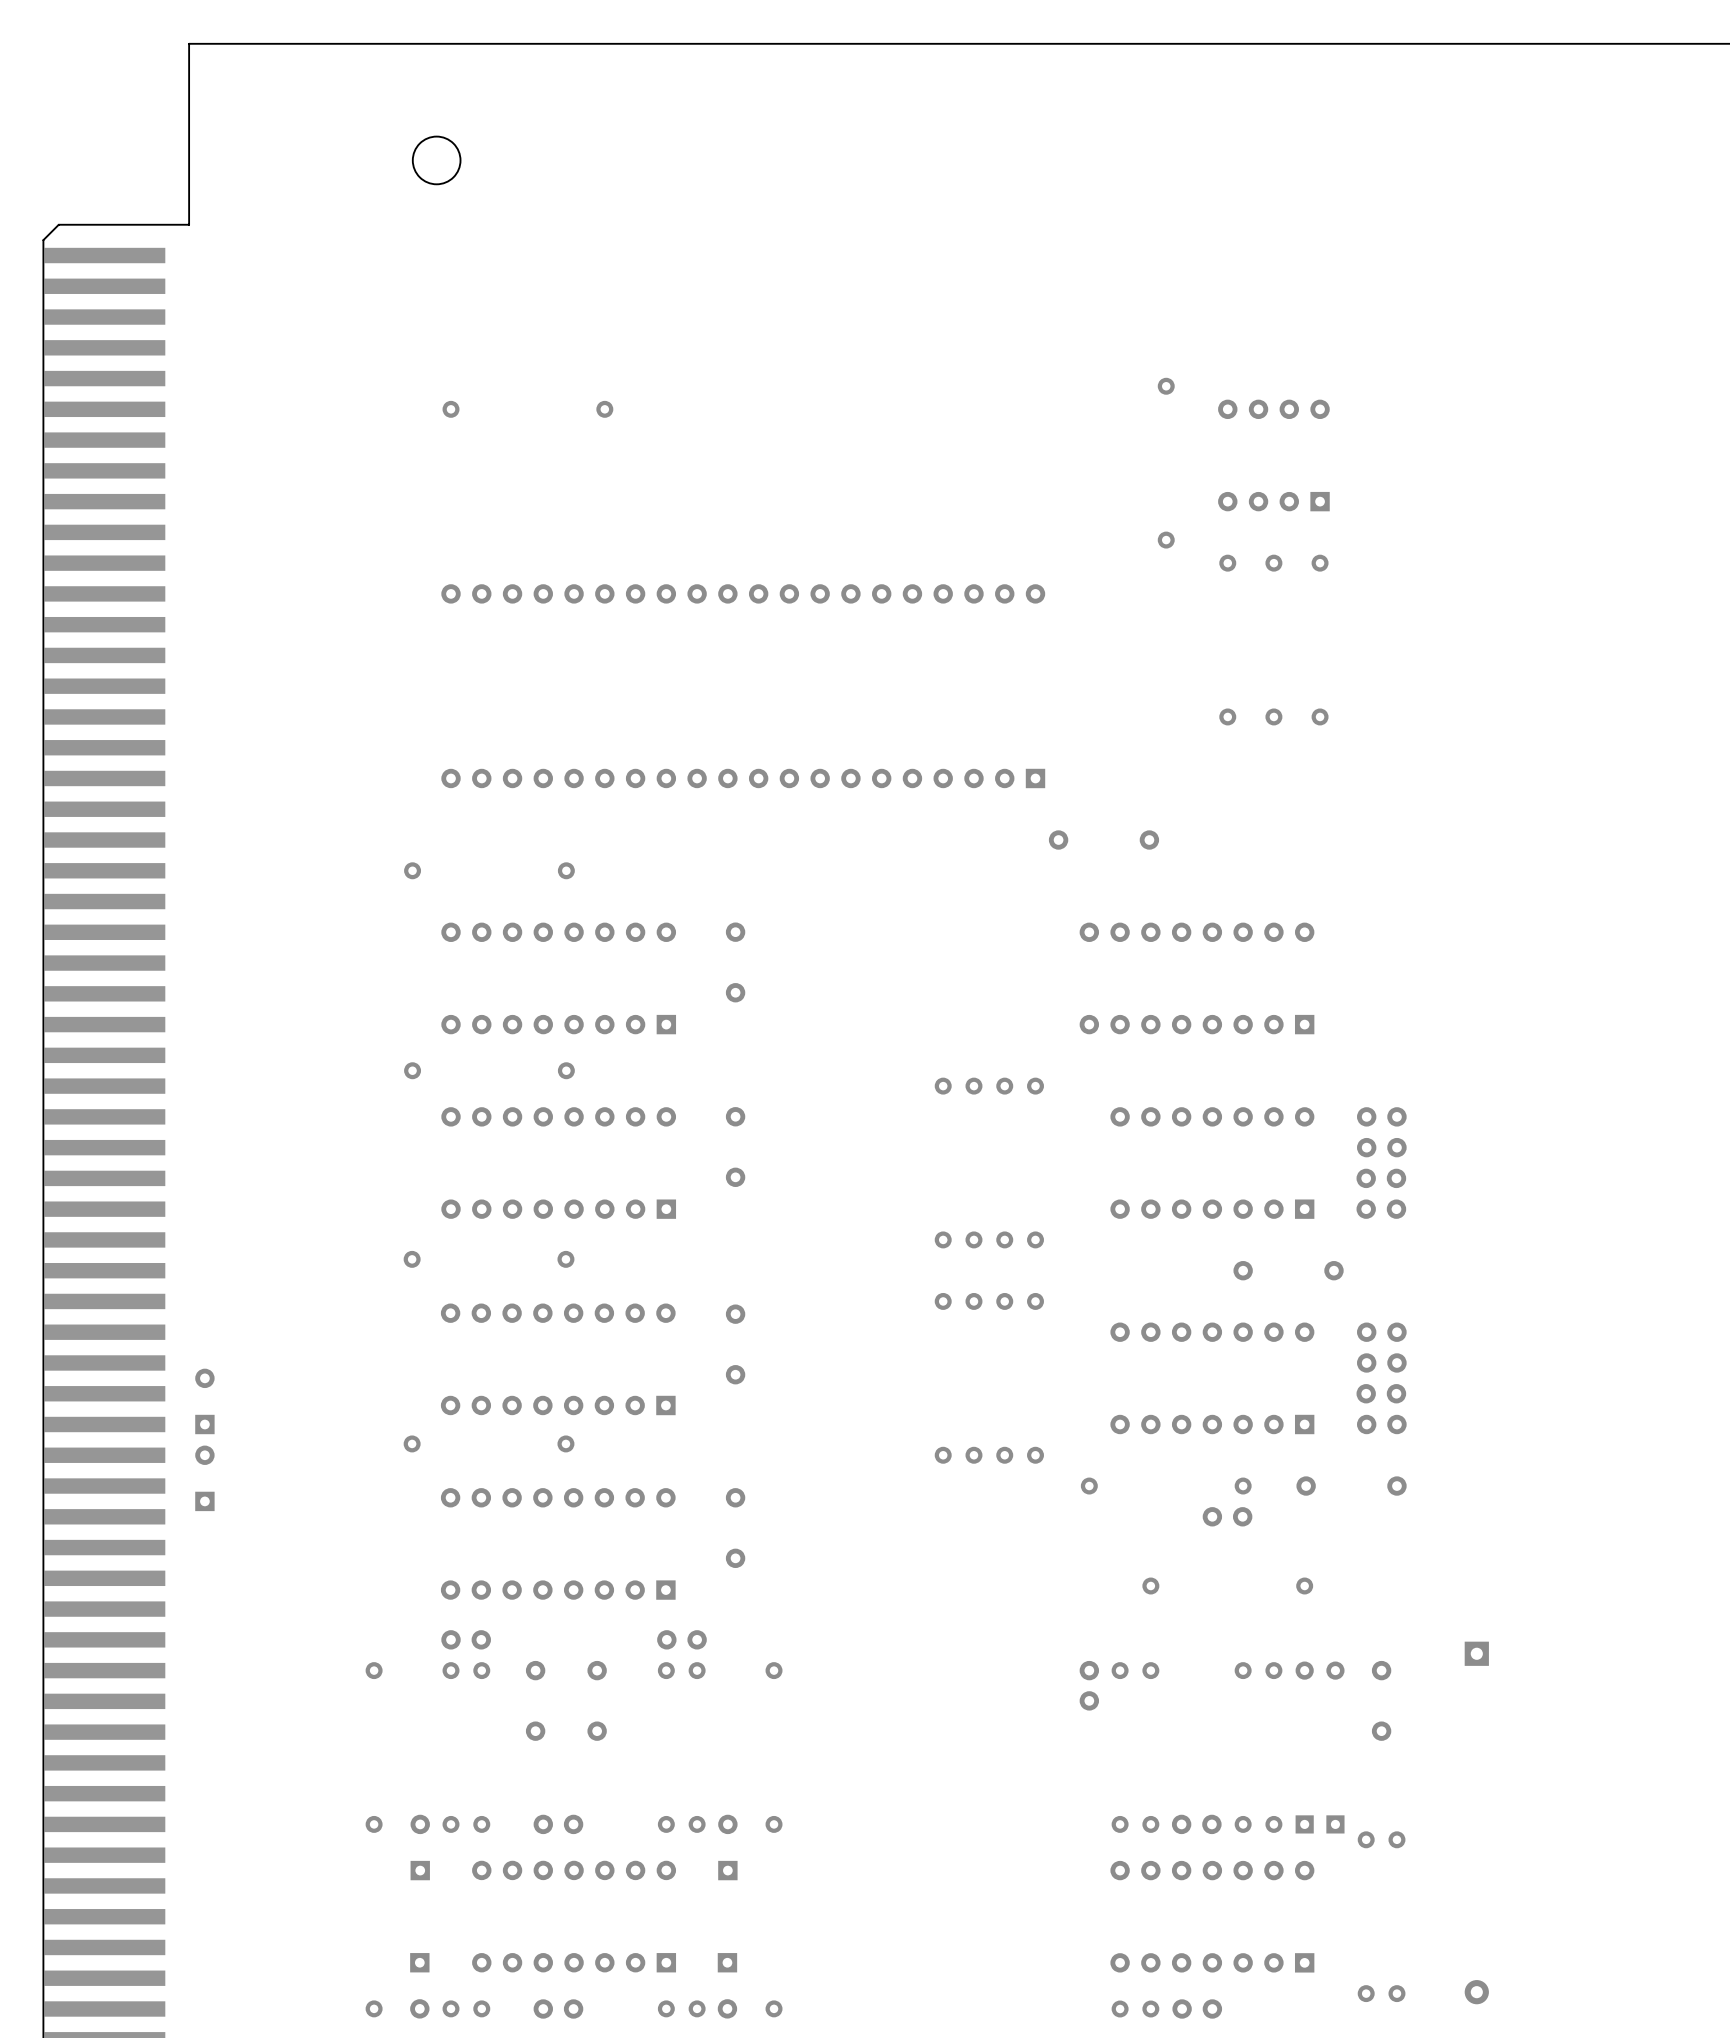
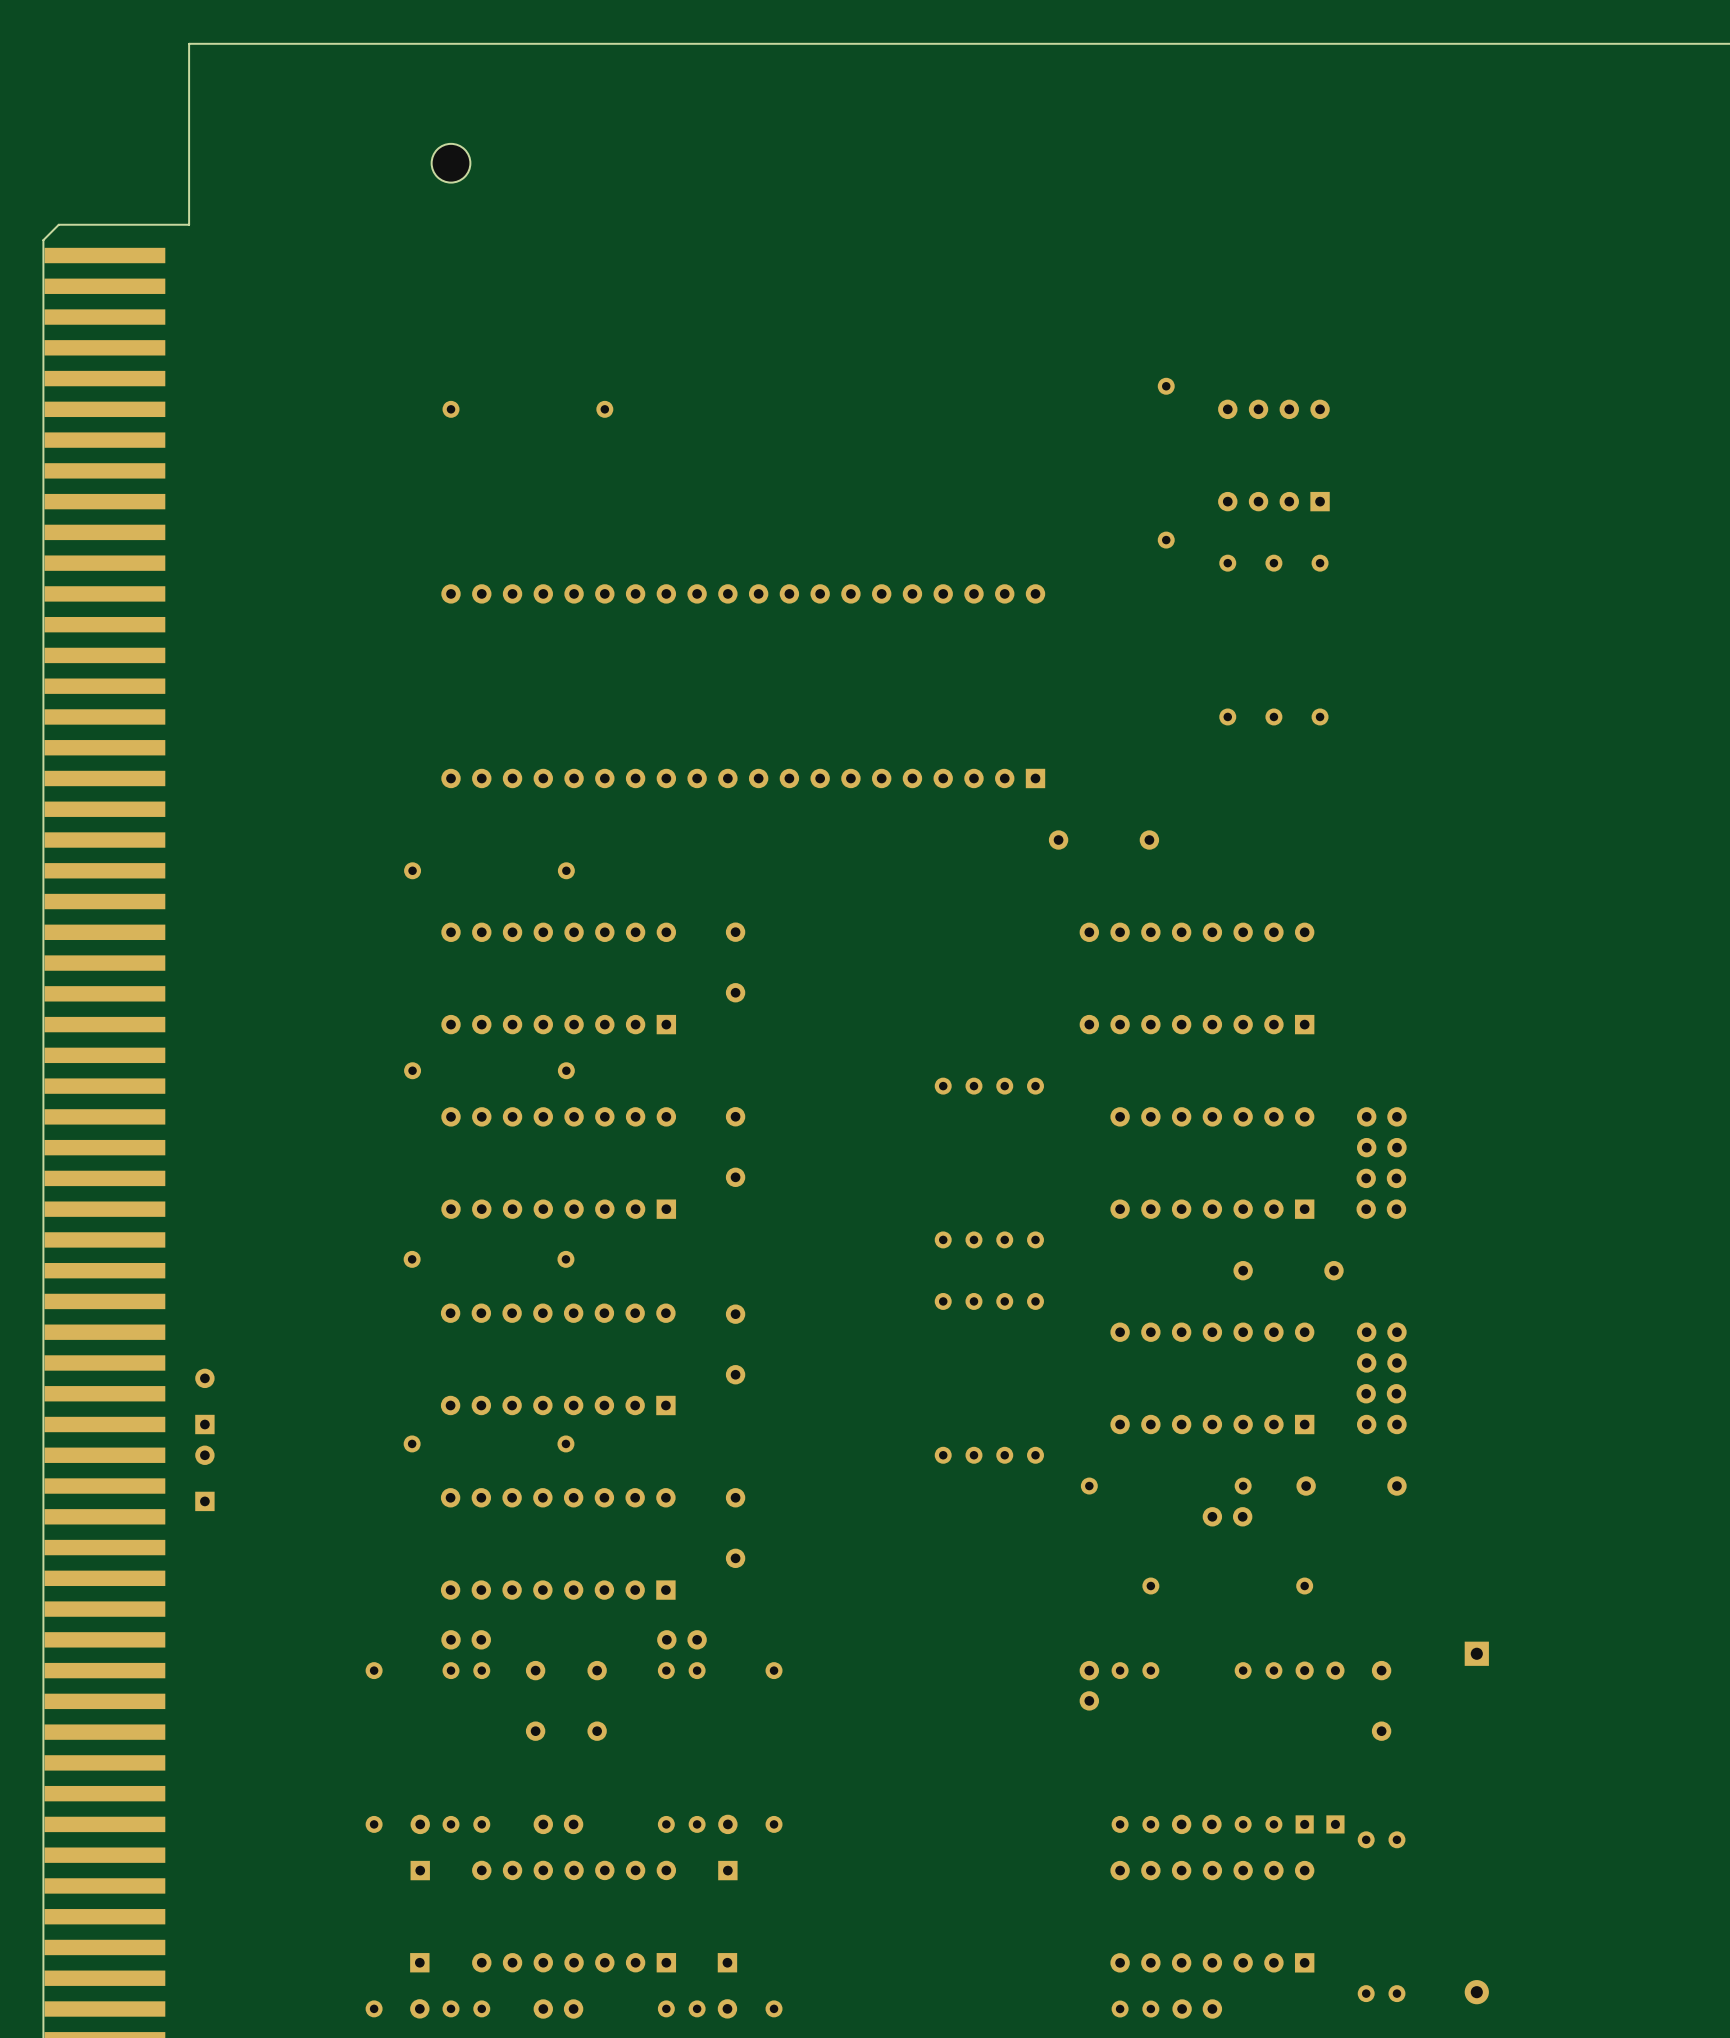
round board edge: [412, 135, 462, 185] -> none
part: none -> (451, 163)

